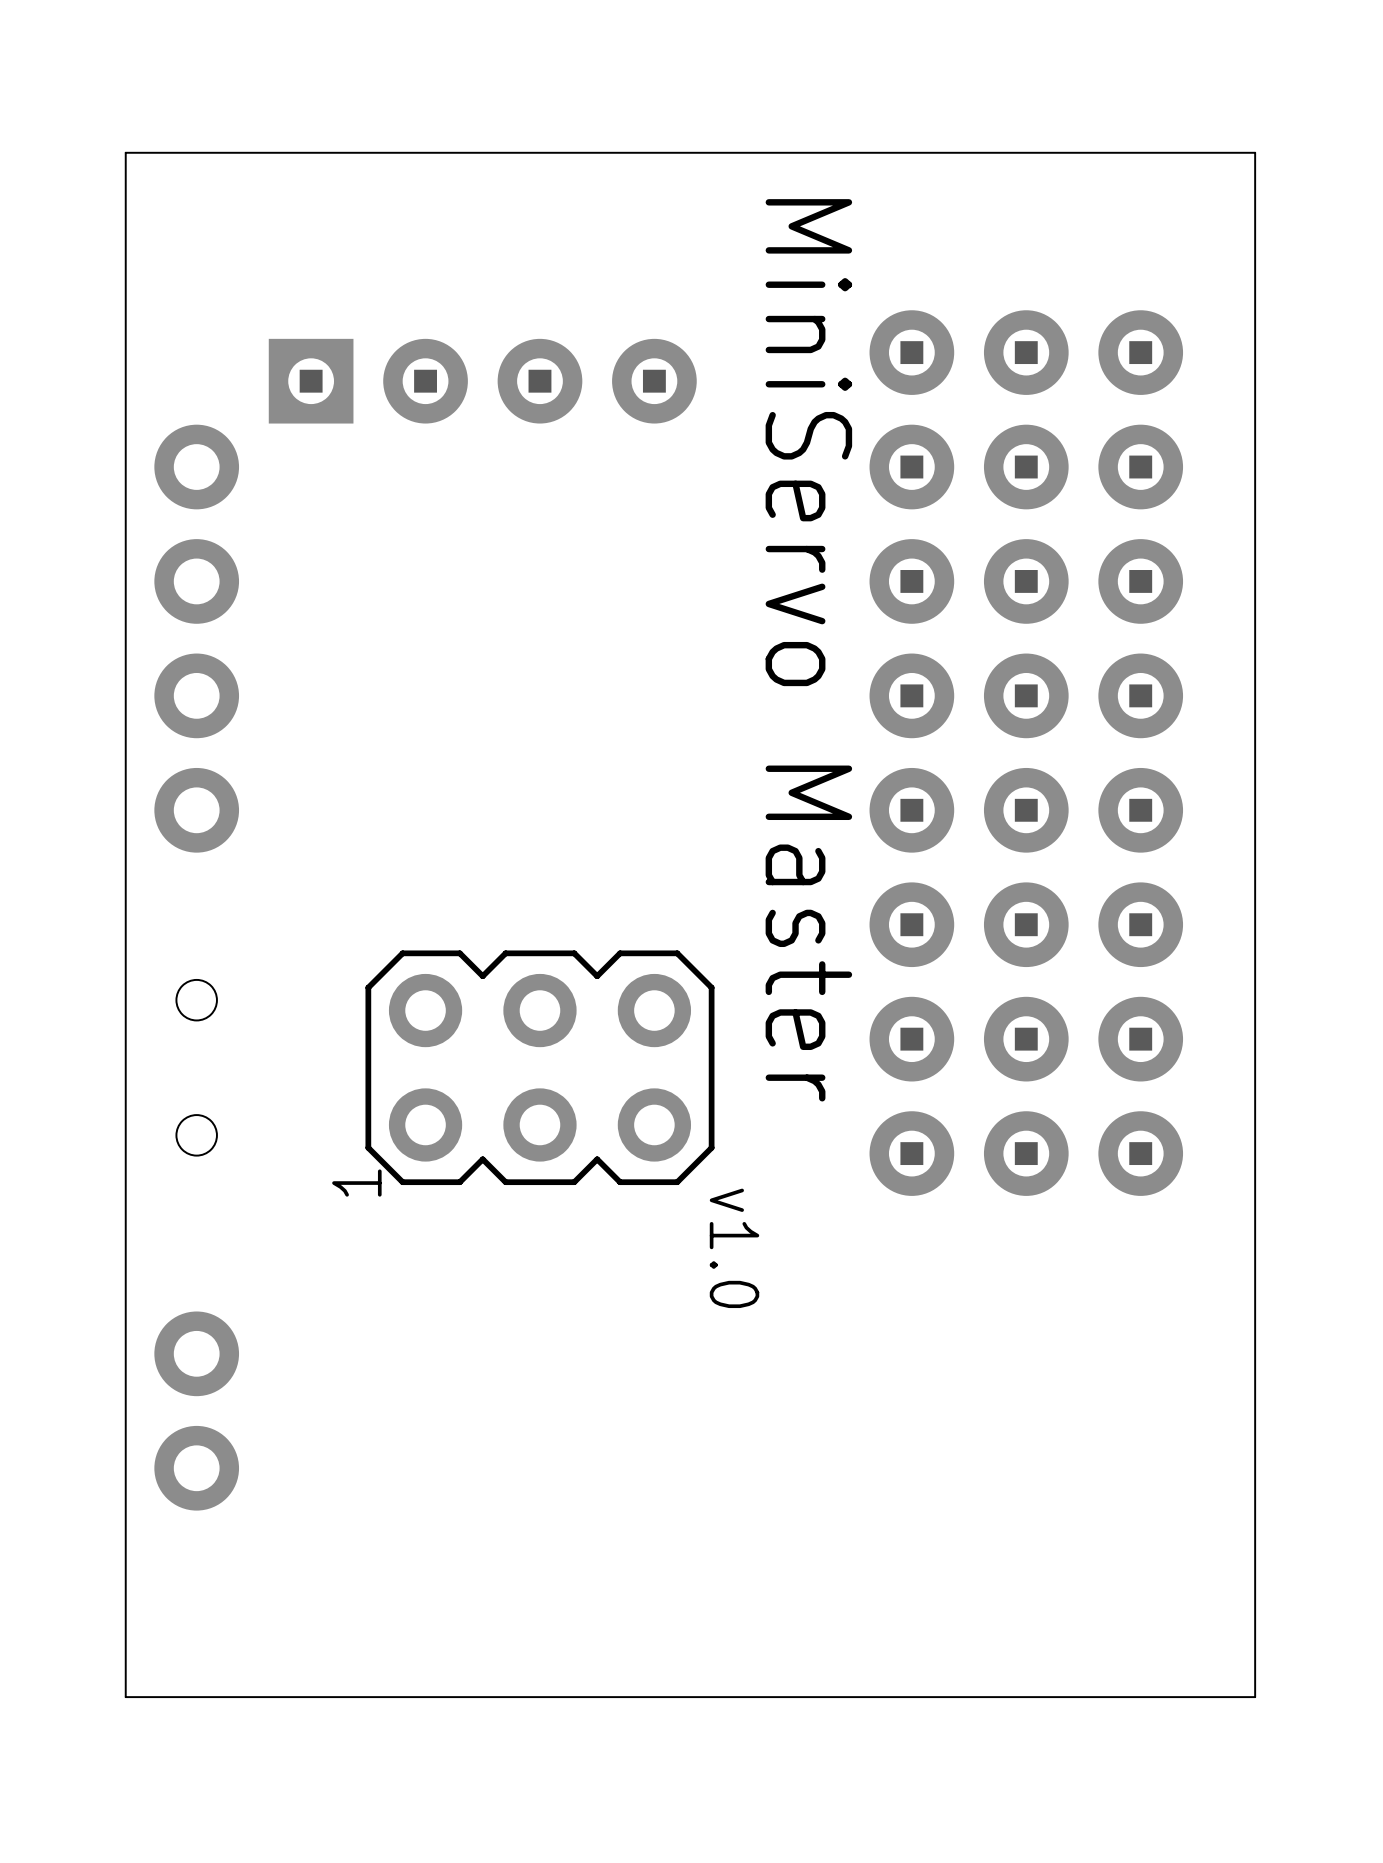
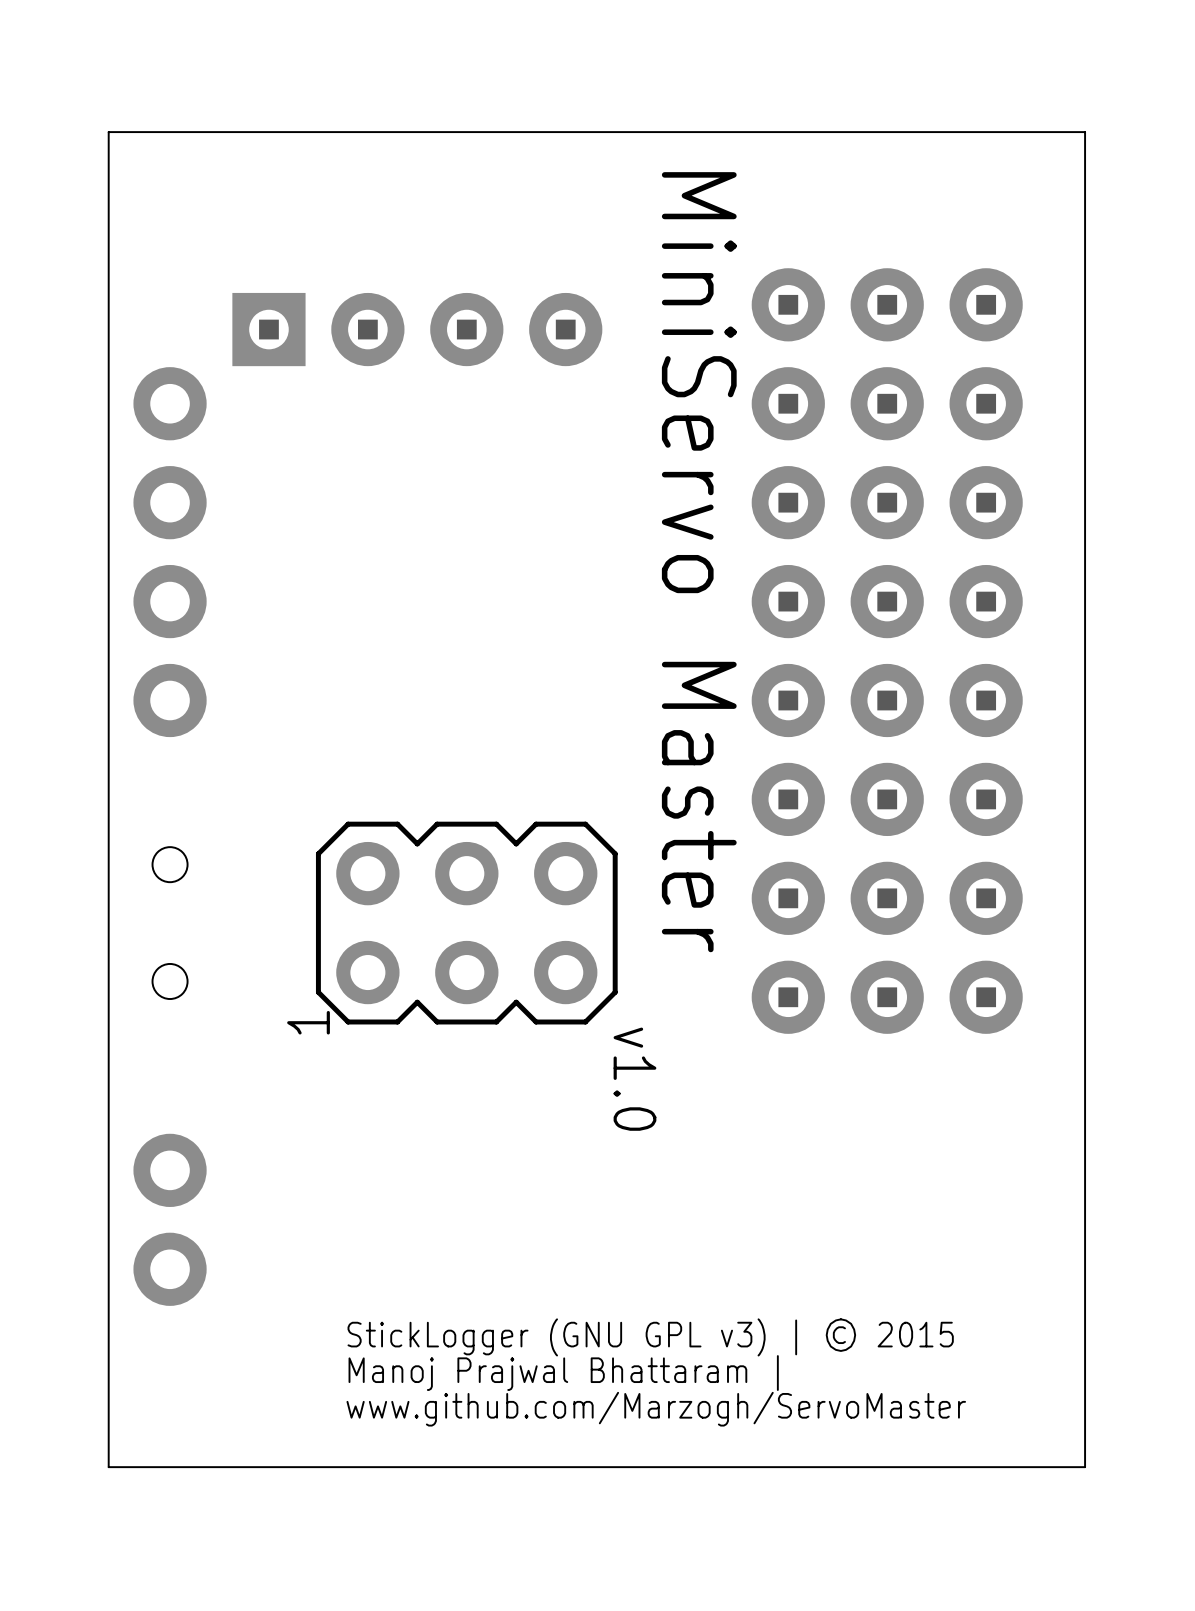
text: none -> StickLogger (GNU GPL v3) | © 2015 (650, 1337)
text: none -> Manoj Prajwal Bhattaram | (563, 1373)
text: none -> www.github.com/Marzogh/ServoMaster (656, 1409)

